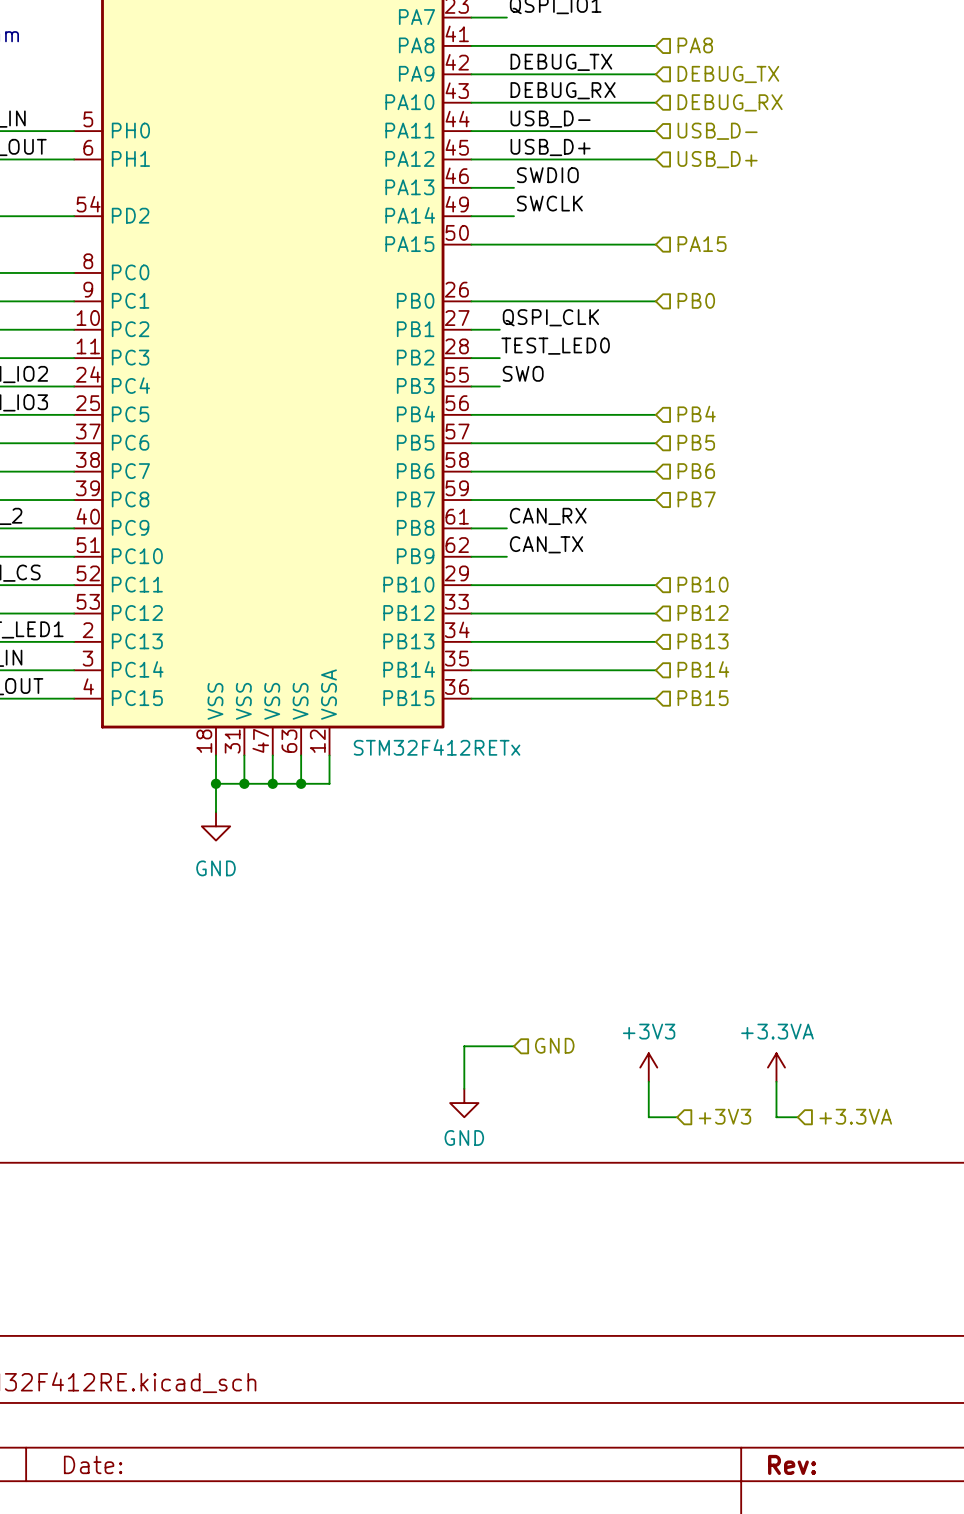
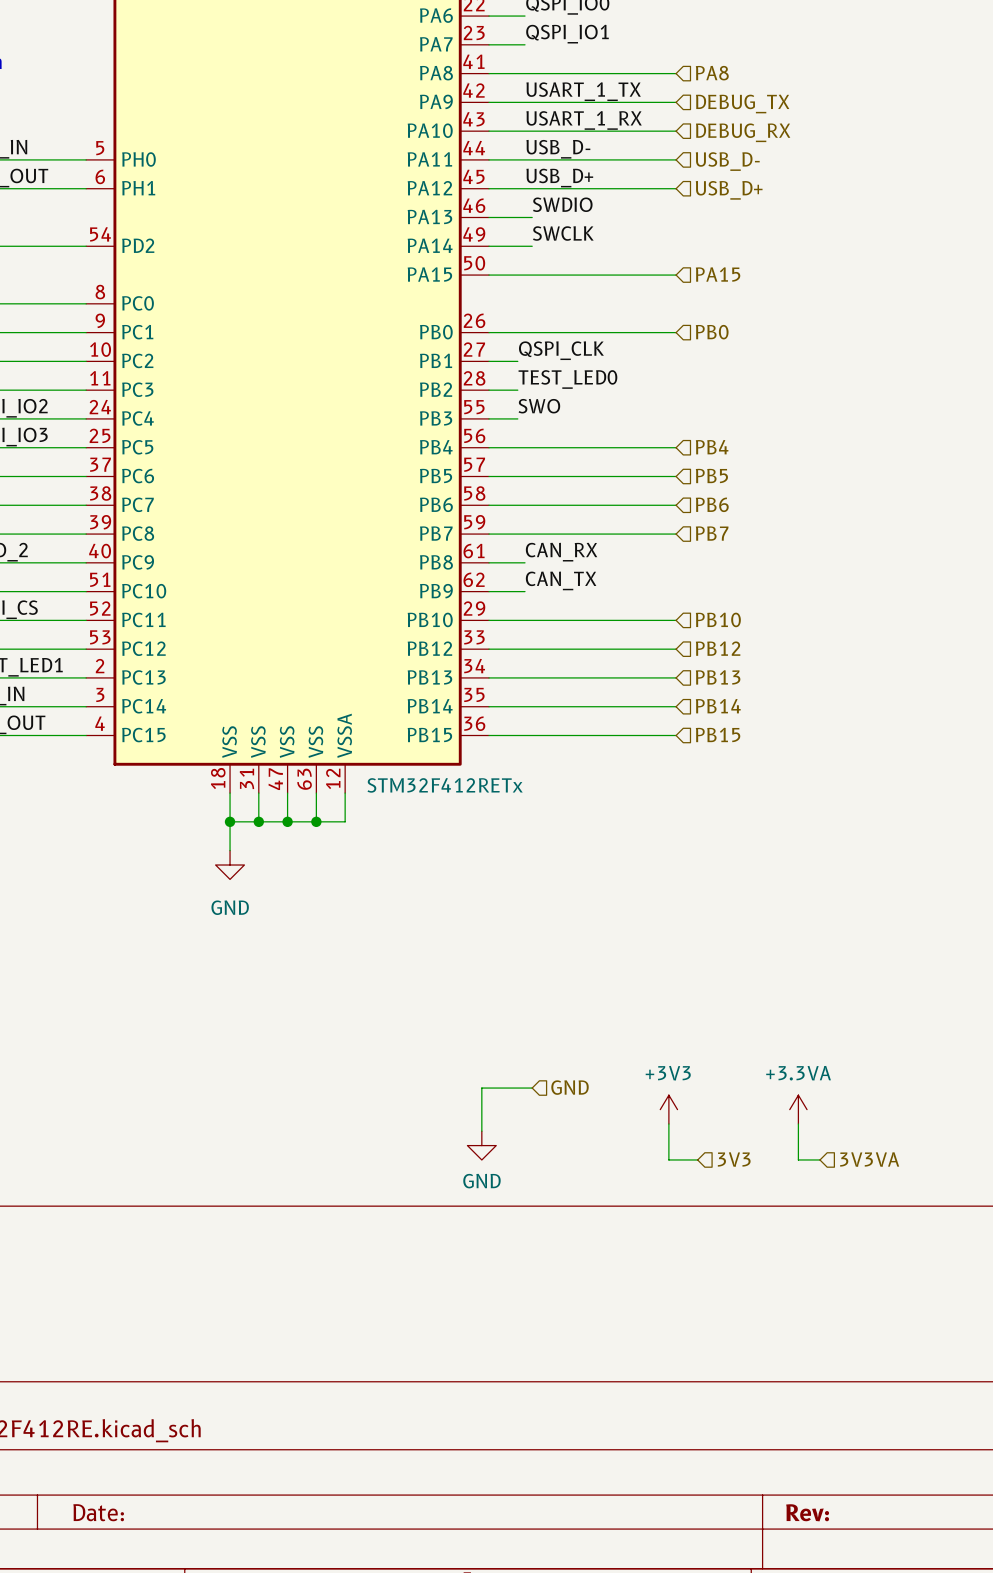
label: DEBUG_TX (561, 62) -> USART_1_TX (583, 91)
label: DEBUG_RX (563, 90) -> USART_1_RX (584, 120)
hierarchical label: +3V3 (725, 1116) -> 3V3 (734, 1159)
hierarchical label: +3.3VA (855, 1116) -> 3V3VA (869, 1159)

